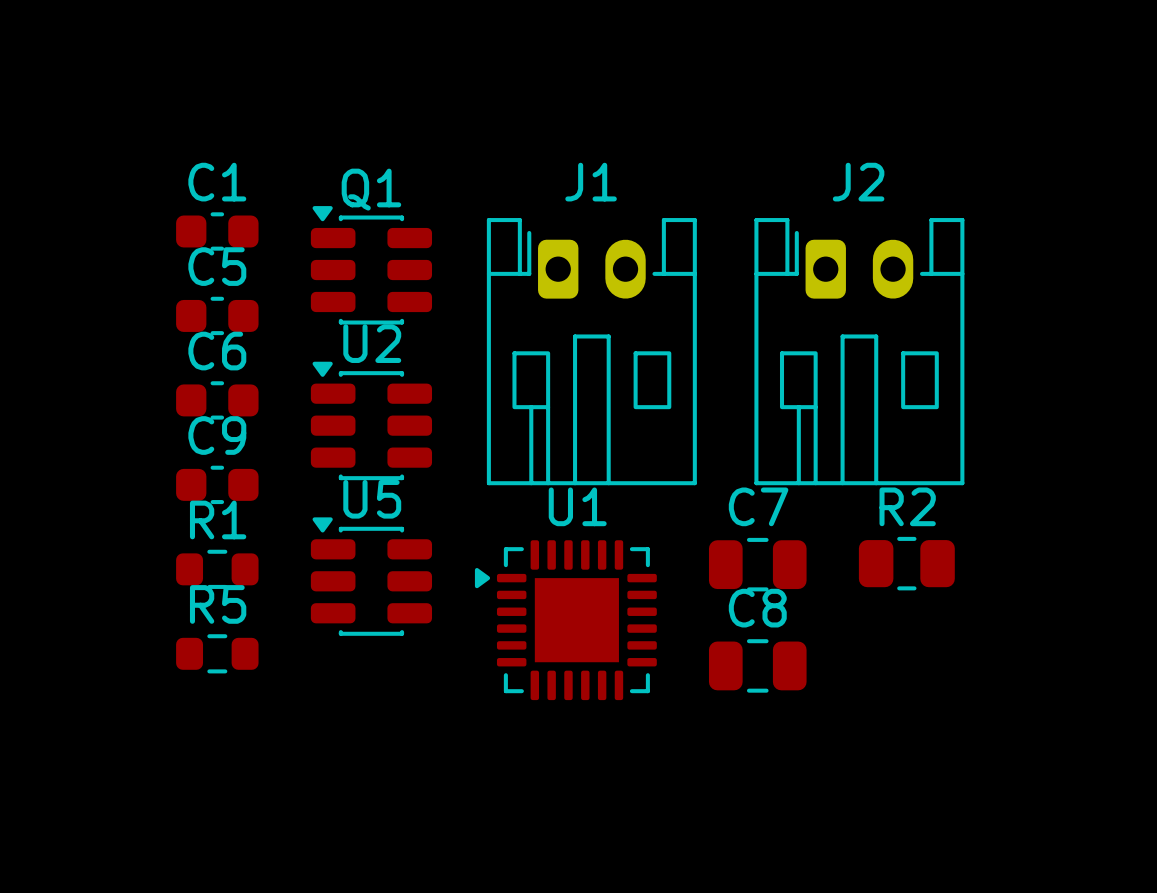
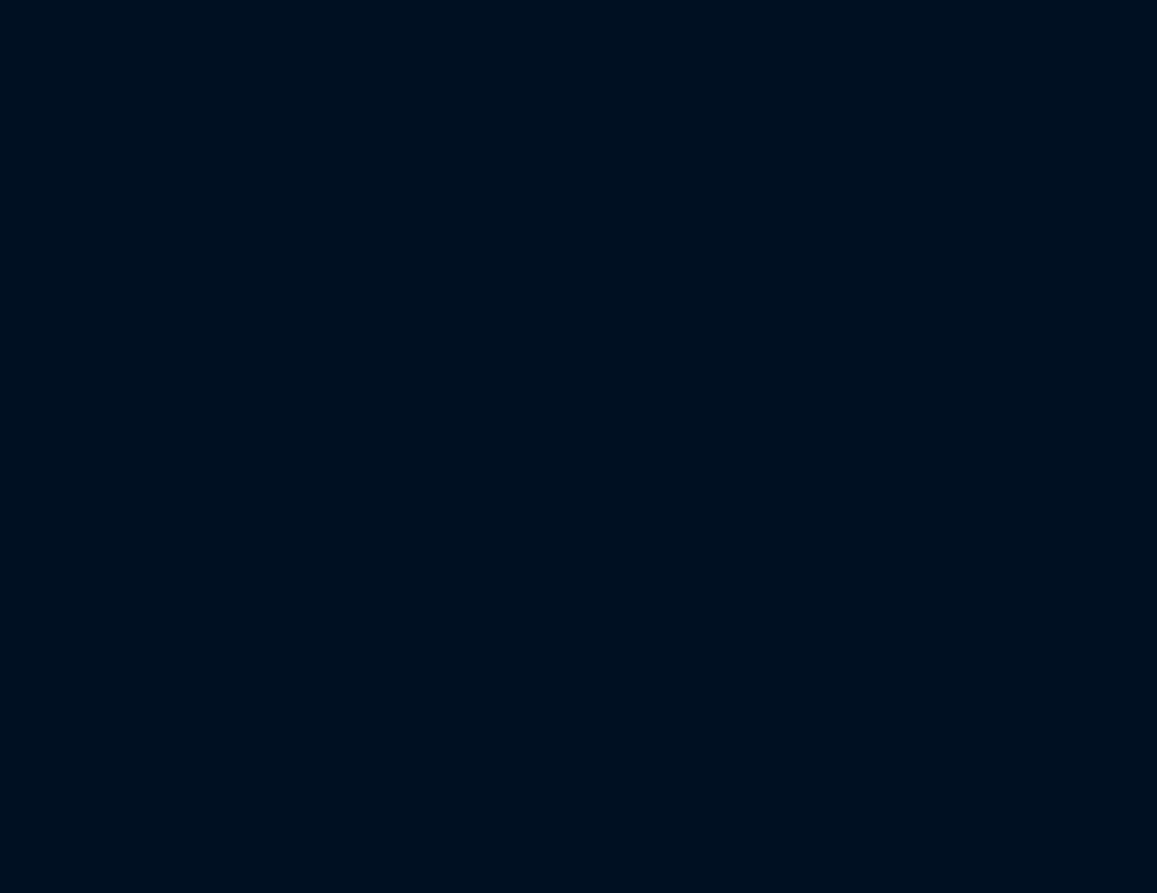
C1: (217, 231) -> none
Q1: (371, 265) -> none
C5: (217, 315) -> none
J1: (591, 351) -> none
J2: (859, 351) -> none
C6: (217, 400) -> none
U2: (371, 420) -> none
C9: (217, 484) -> none
R2: (906, 563) -> none
C7: (757, 564) -> none
R1: (217, 569) -> none
U5: (371, 576) -> none
U1: (565, 620) -> none
R5: (217, 653) -> none
C8: (757, 665) -> none

